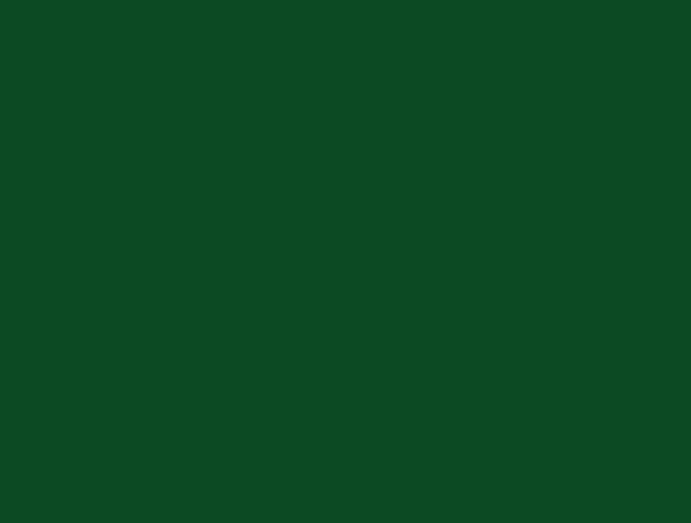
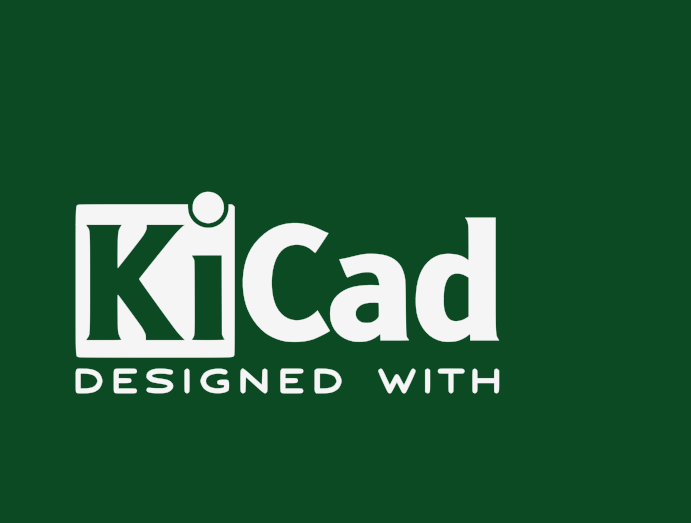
drawing: none -> [75, 191, 500, 394]

